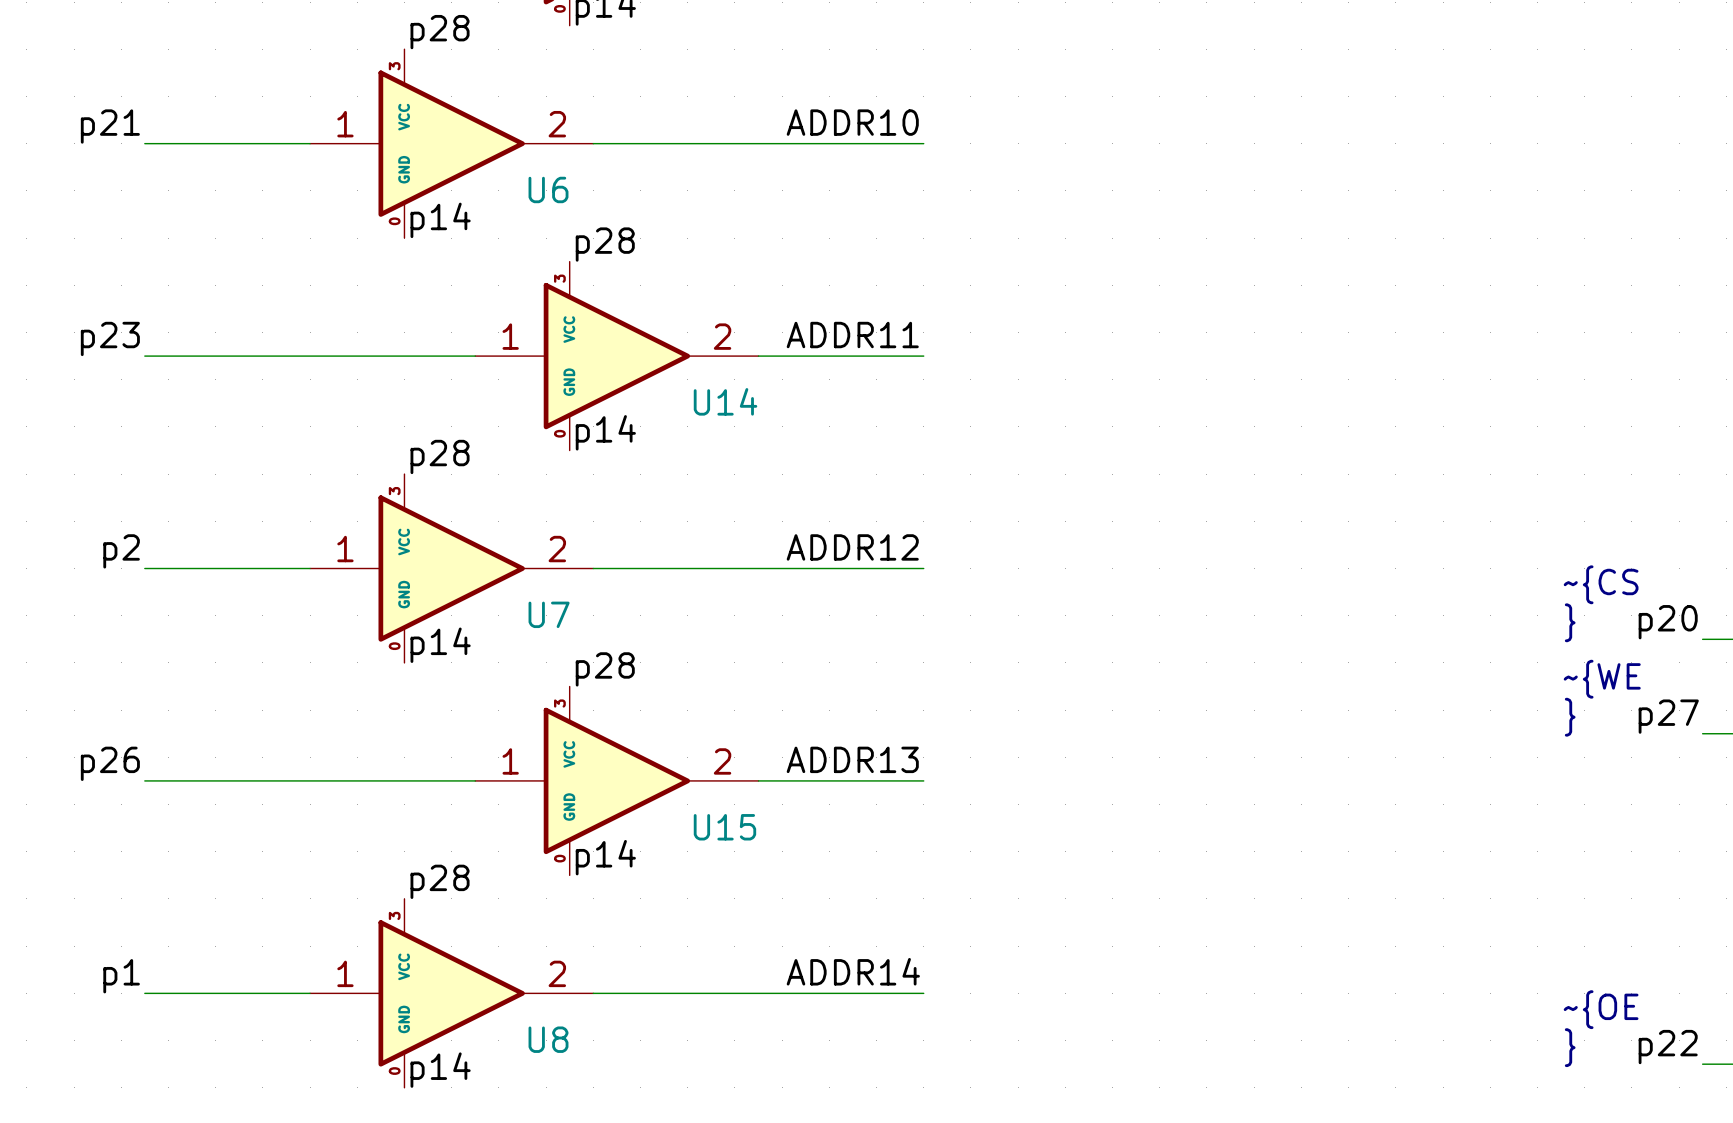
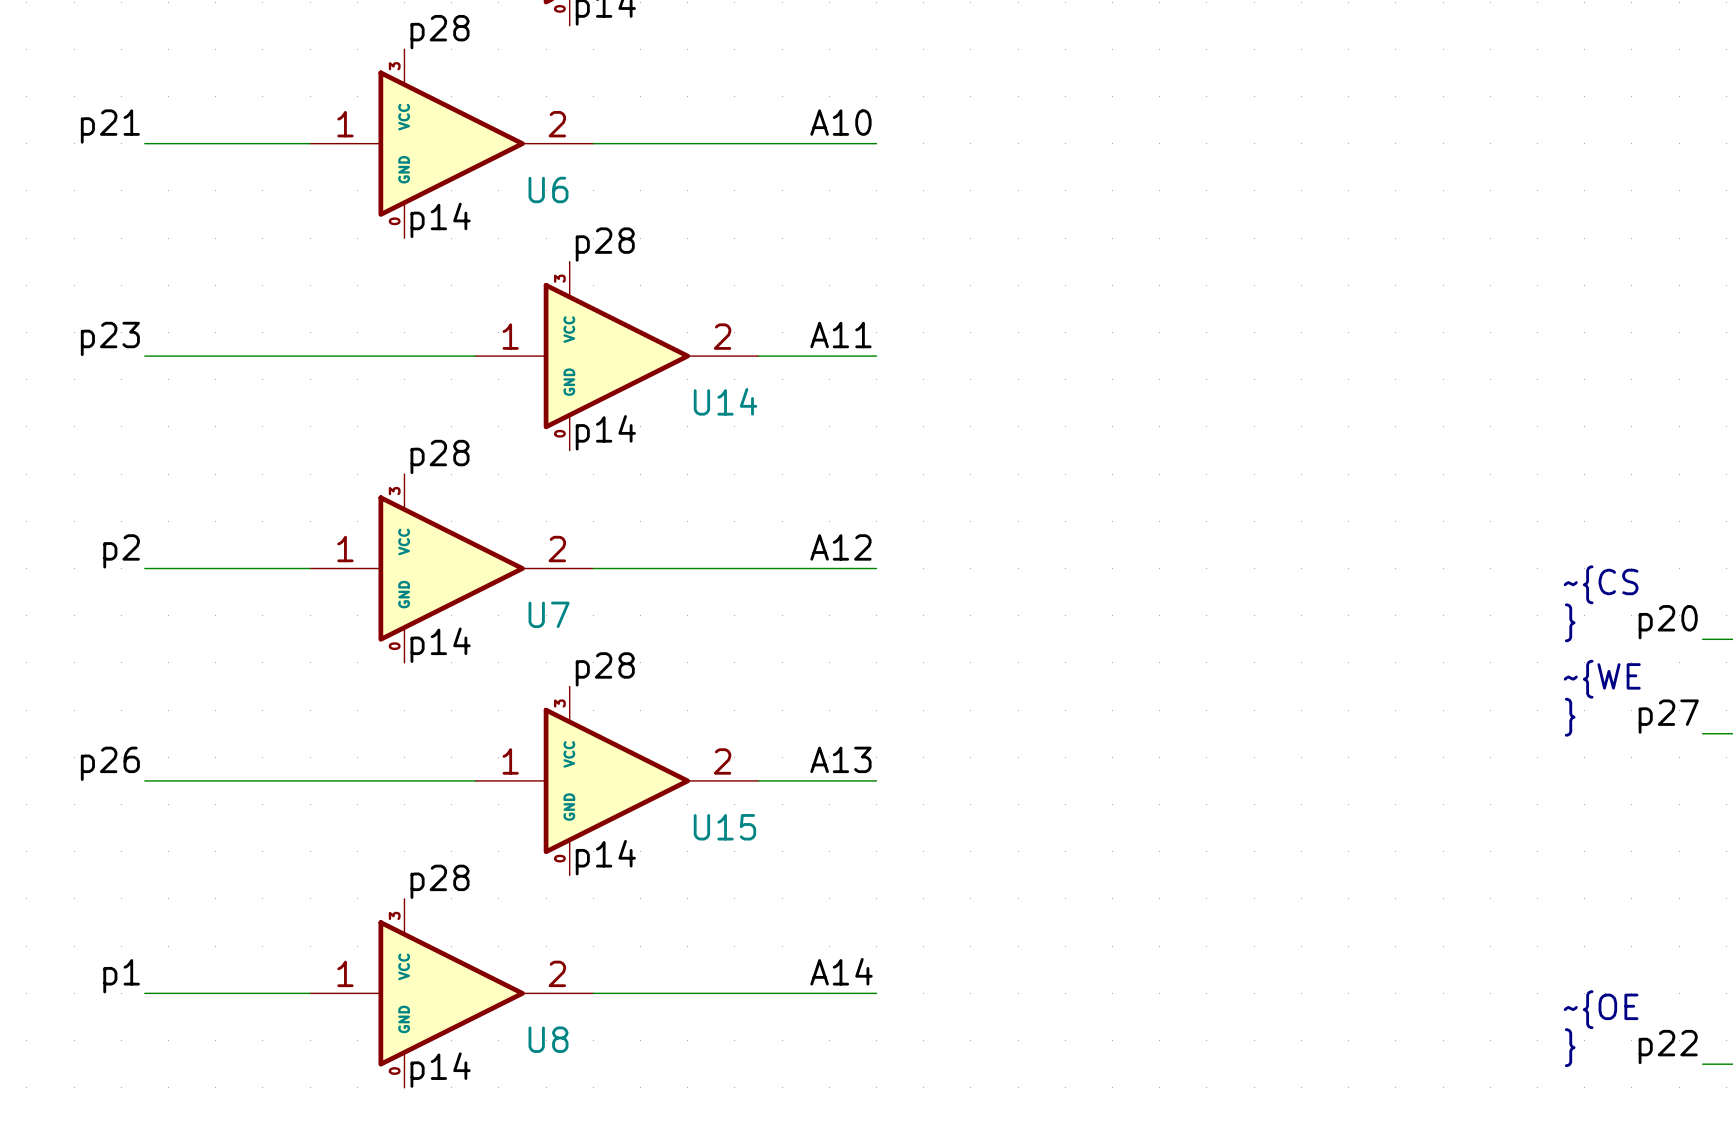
label: ADDR10 (852, 122) -> A10 (840, 122)
wire: (876, 143) (923, 143) -> none
label: ADDR11 (852, 335) -> A11 (840, 335)
wire: (876, 356) (923, 356) -> none
label: ADDR12 (852, 547) -> A12 (840, 547)
wire: (876, 568) (923, 568) -> none
label: ADDR13 (852, 759) -> A13 (840, 759)
wire: (876, 780) (923, 780) -> none
label: ADDR14 (853, 971) -> A14 (841, 971)
wire: (876, 993) (923, 993) -> none

